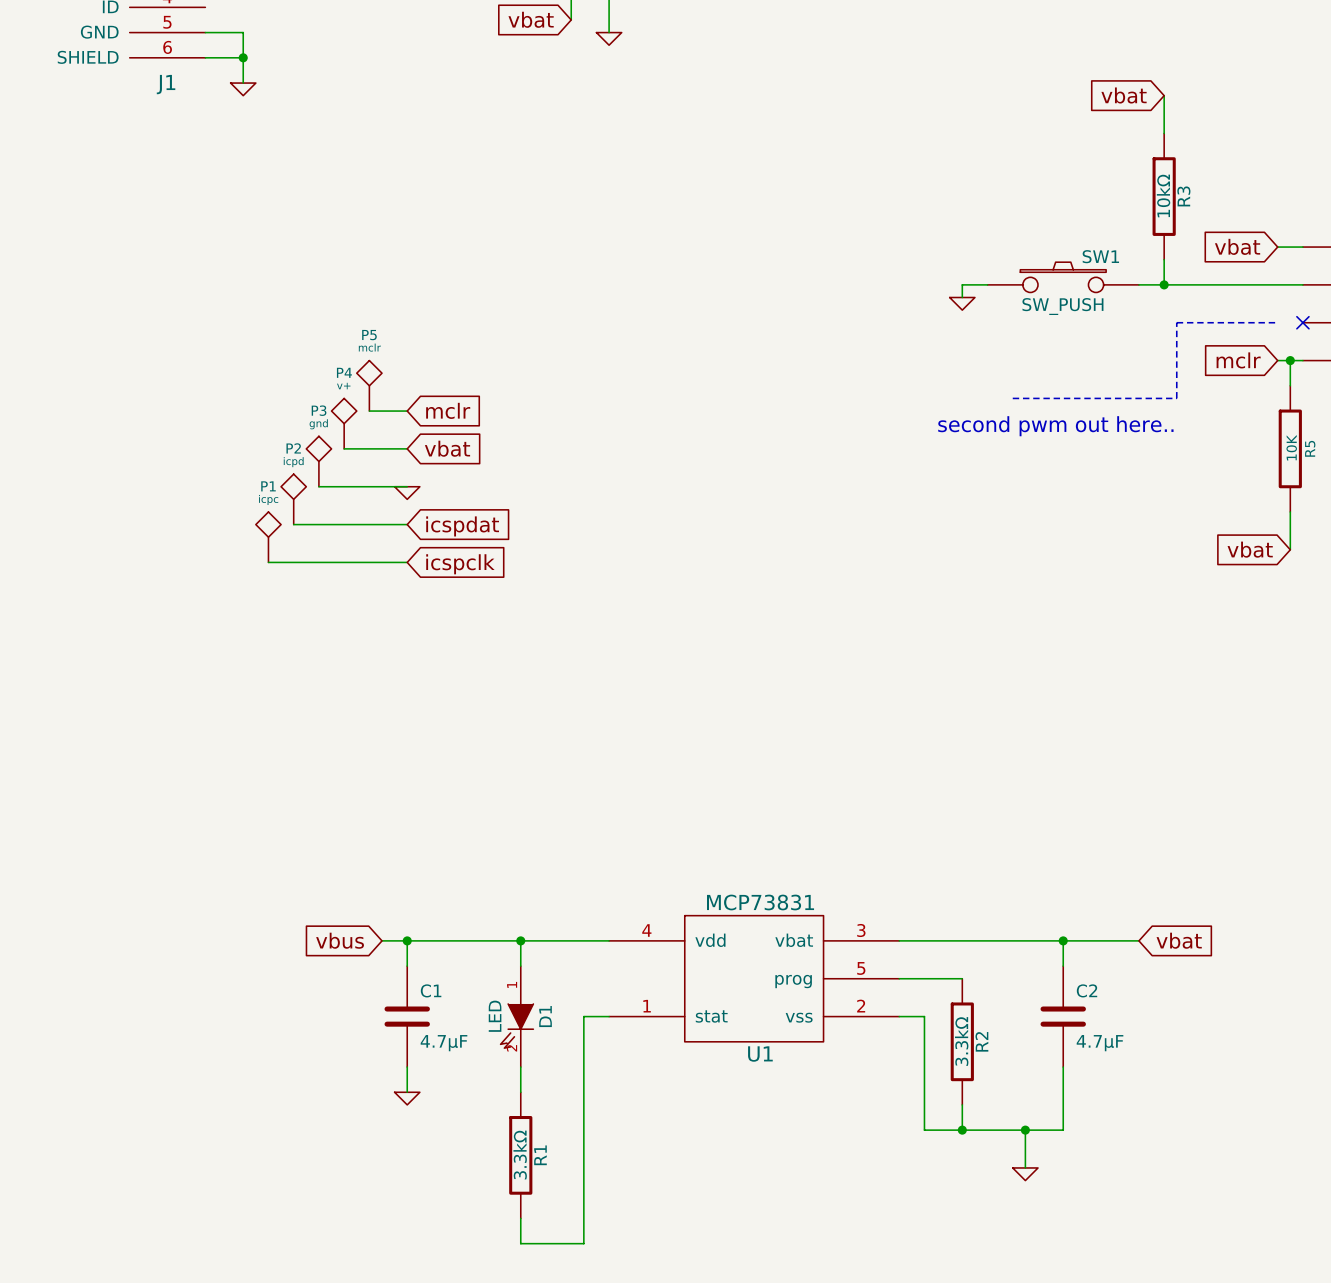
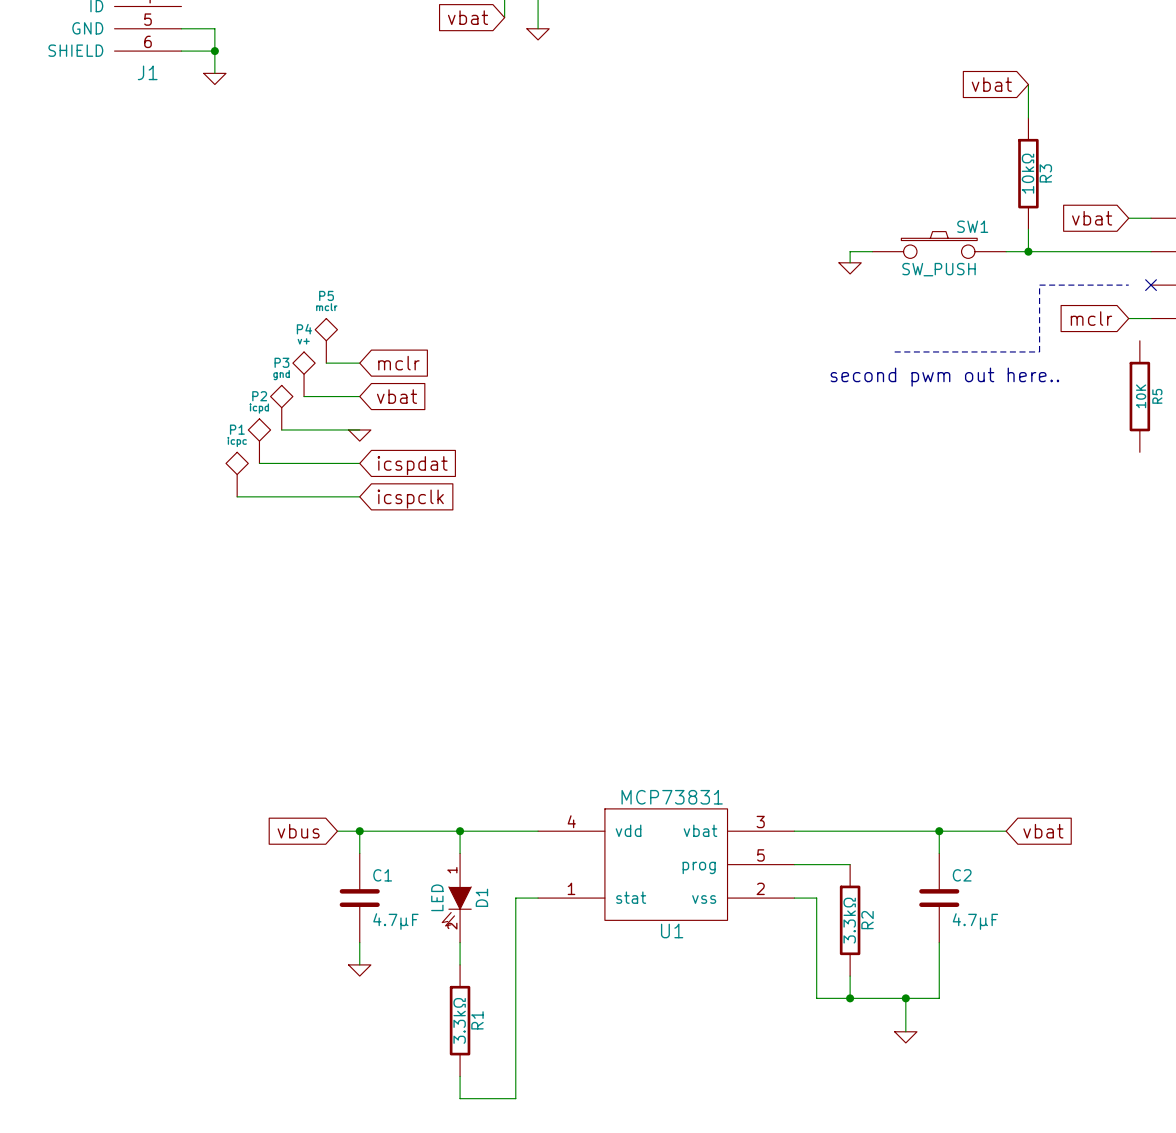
wire: (1290, 360) (1290, 385) -> none
junction: (1290, 360) -> none
wire: (1290, 511) (1290, 549) -> none
global label: vbat (1250, 549) -> none

